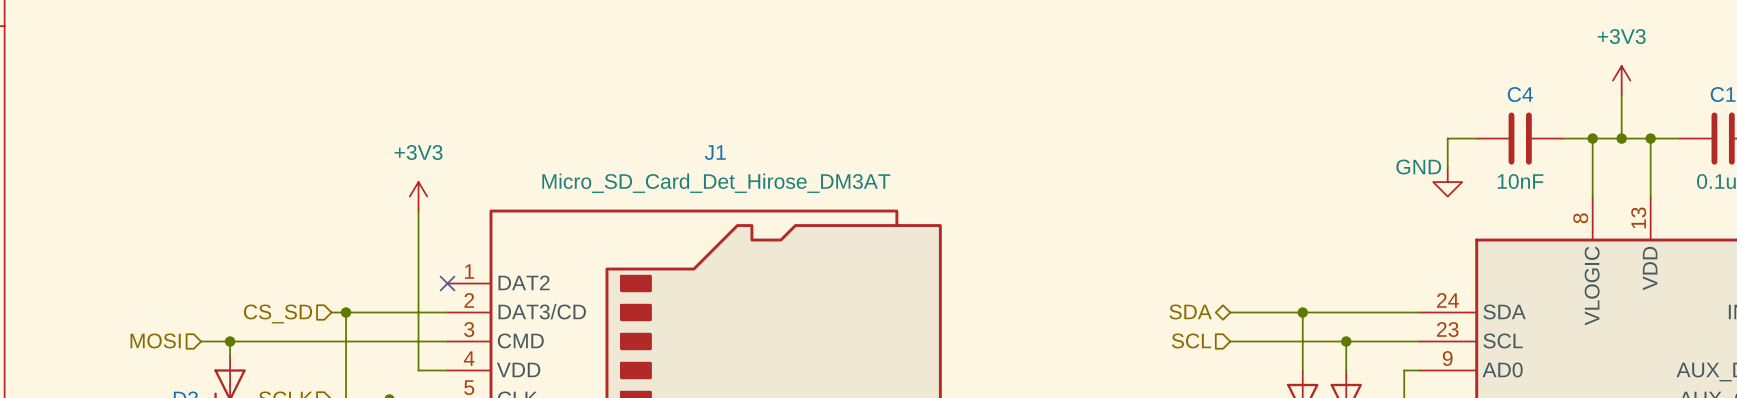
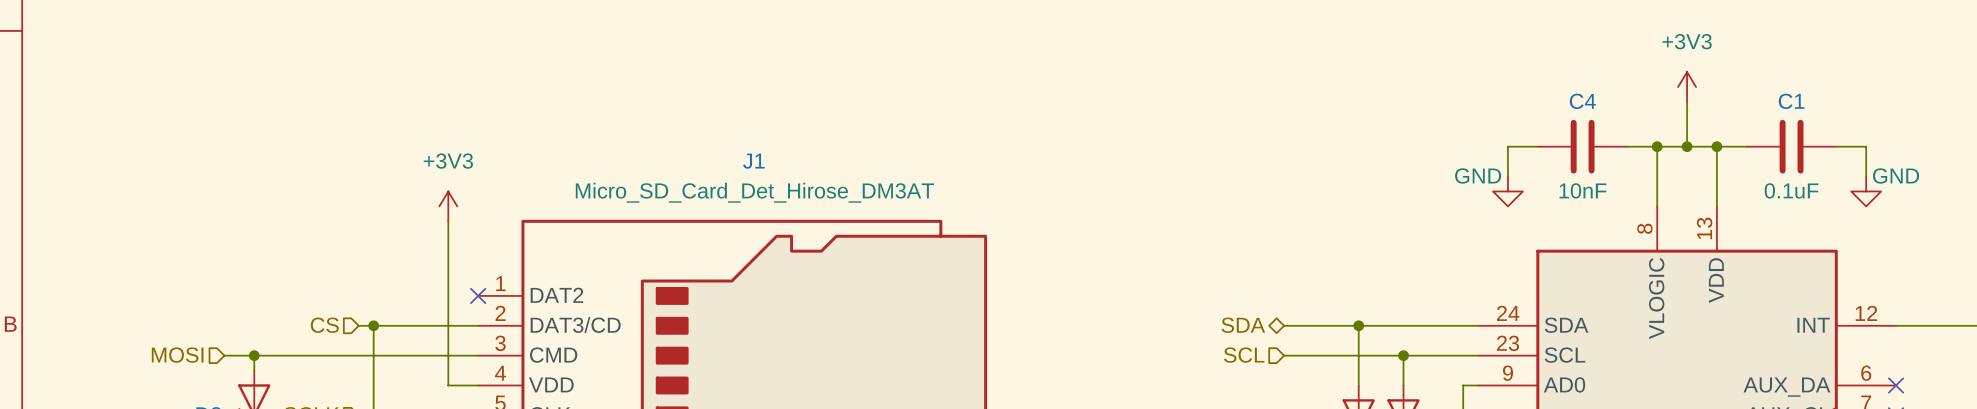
hierarchical label: CS_SD (278, 313) -> CS (324, 325)

